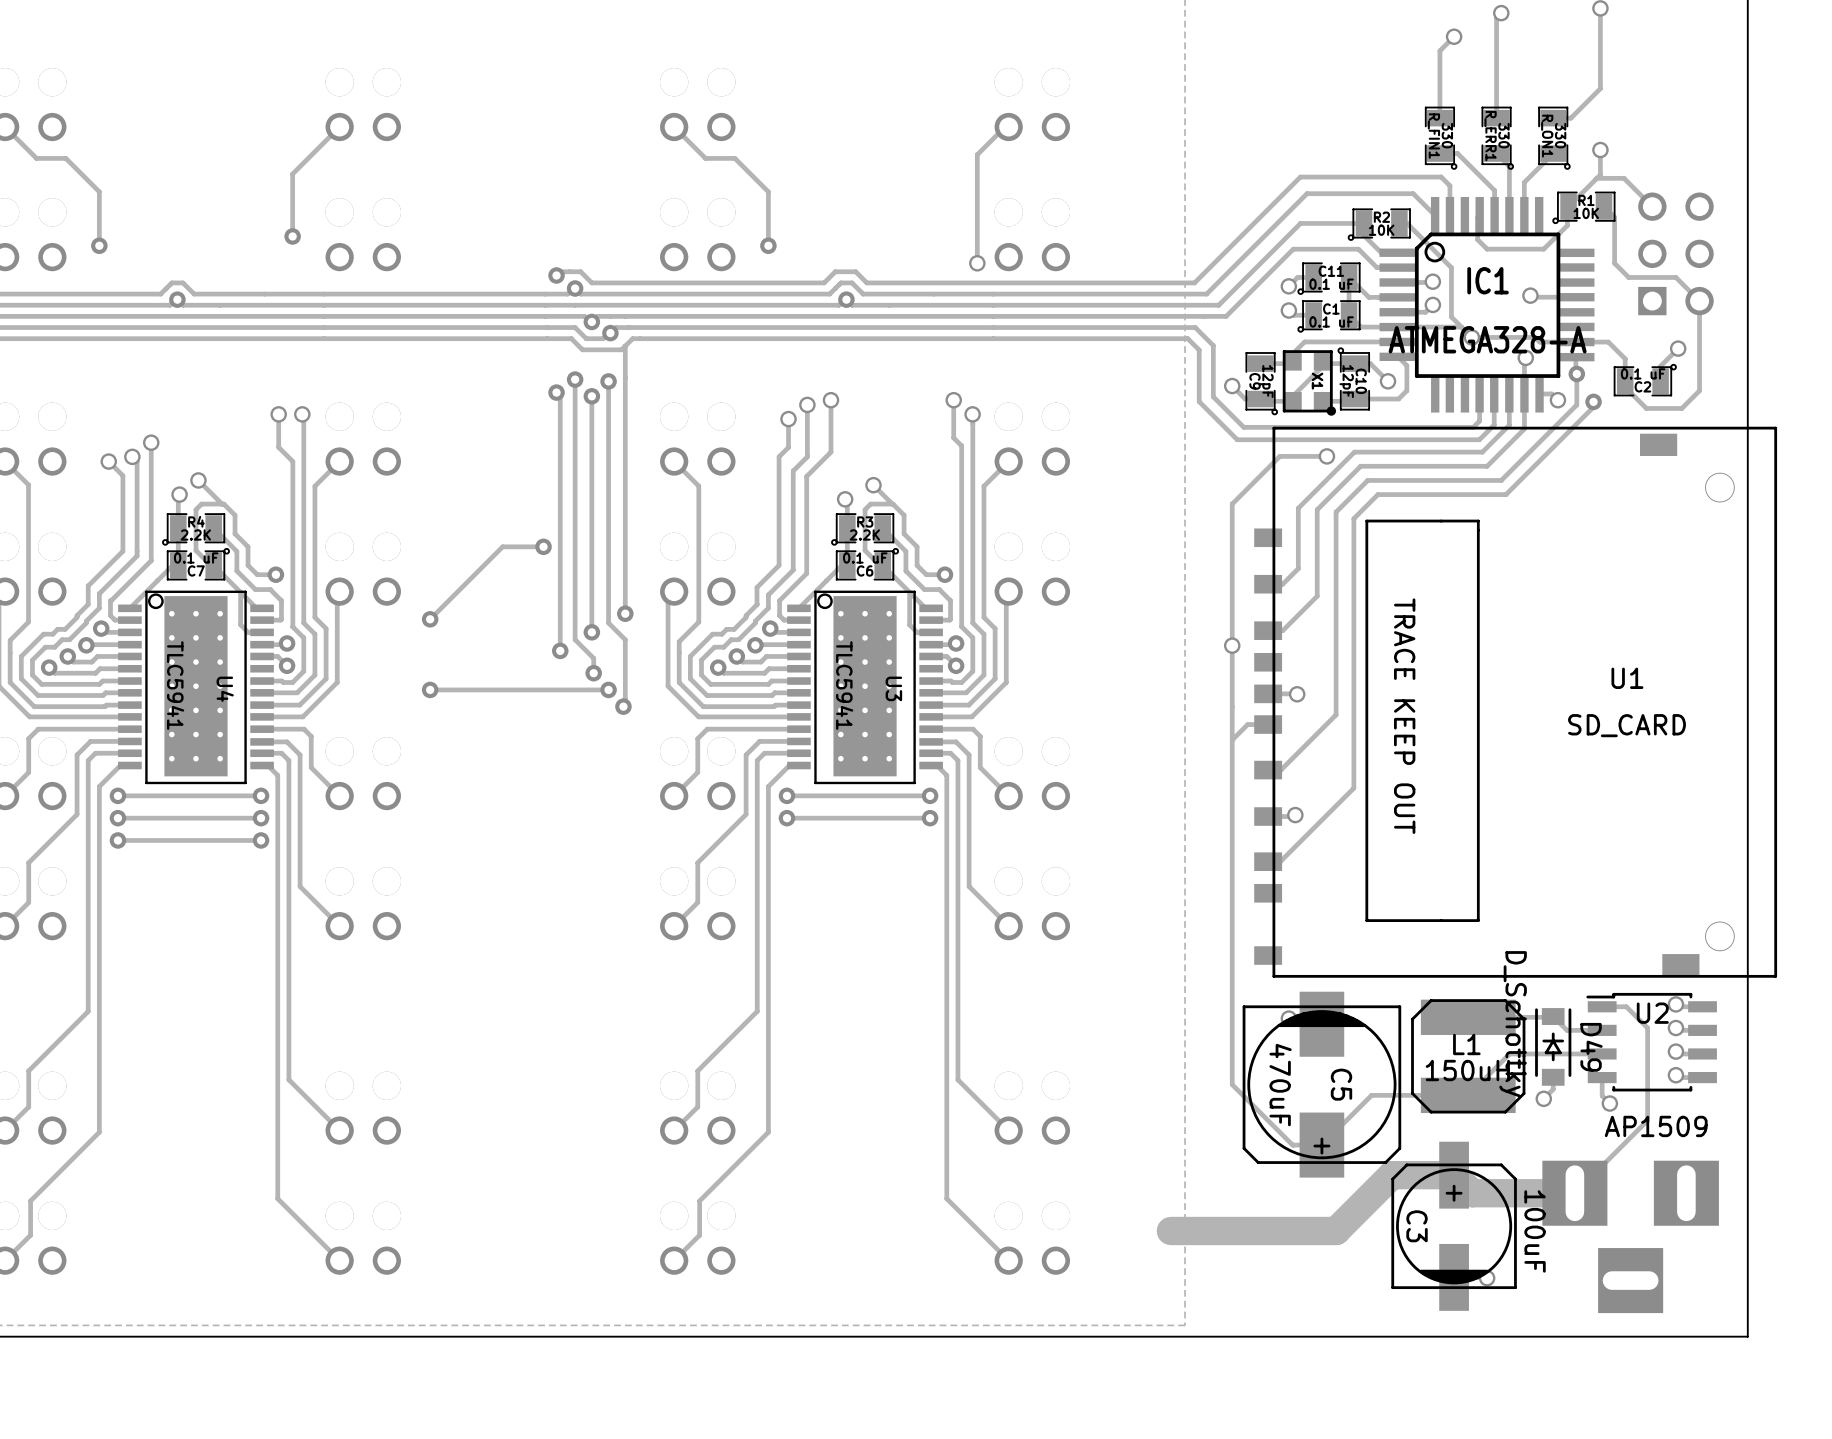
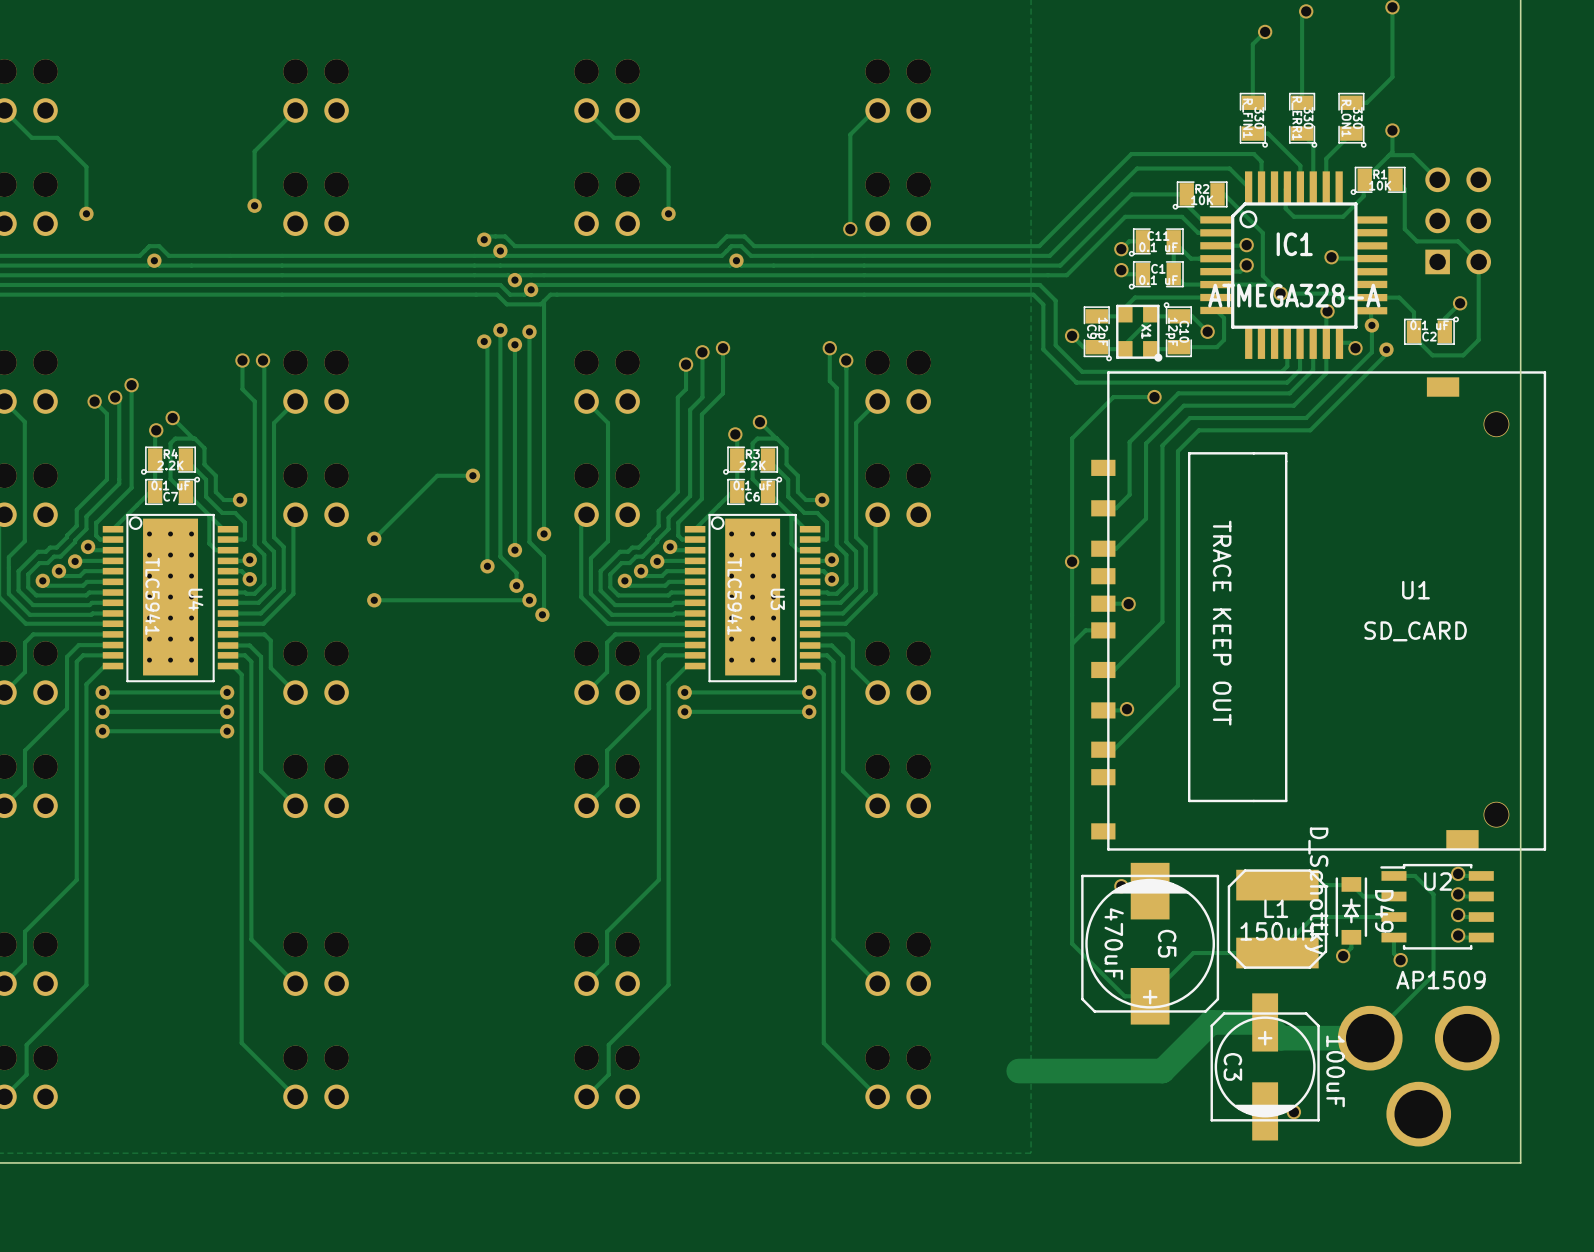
part footprint: [1542, 1160, 1719, 1314] -> [1337, 1005, 1500, 1147]

